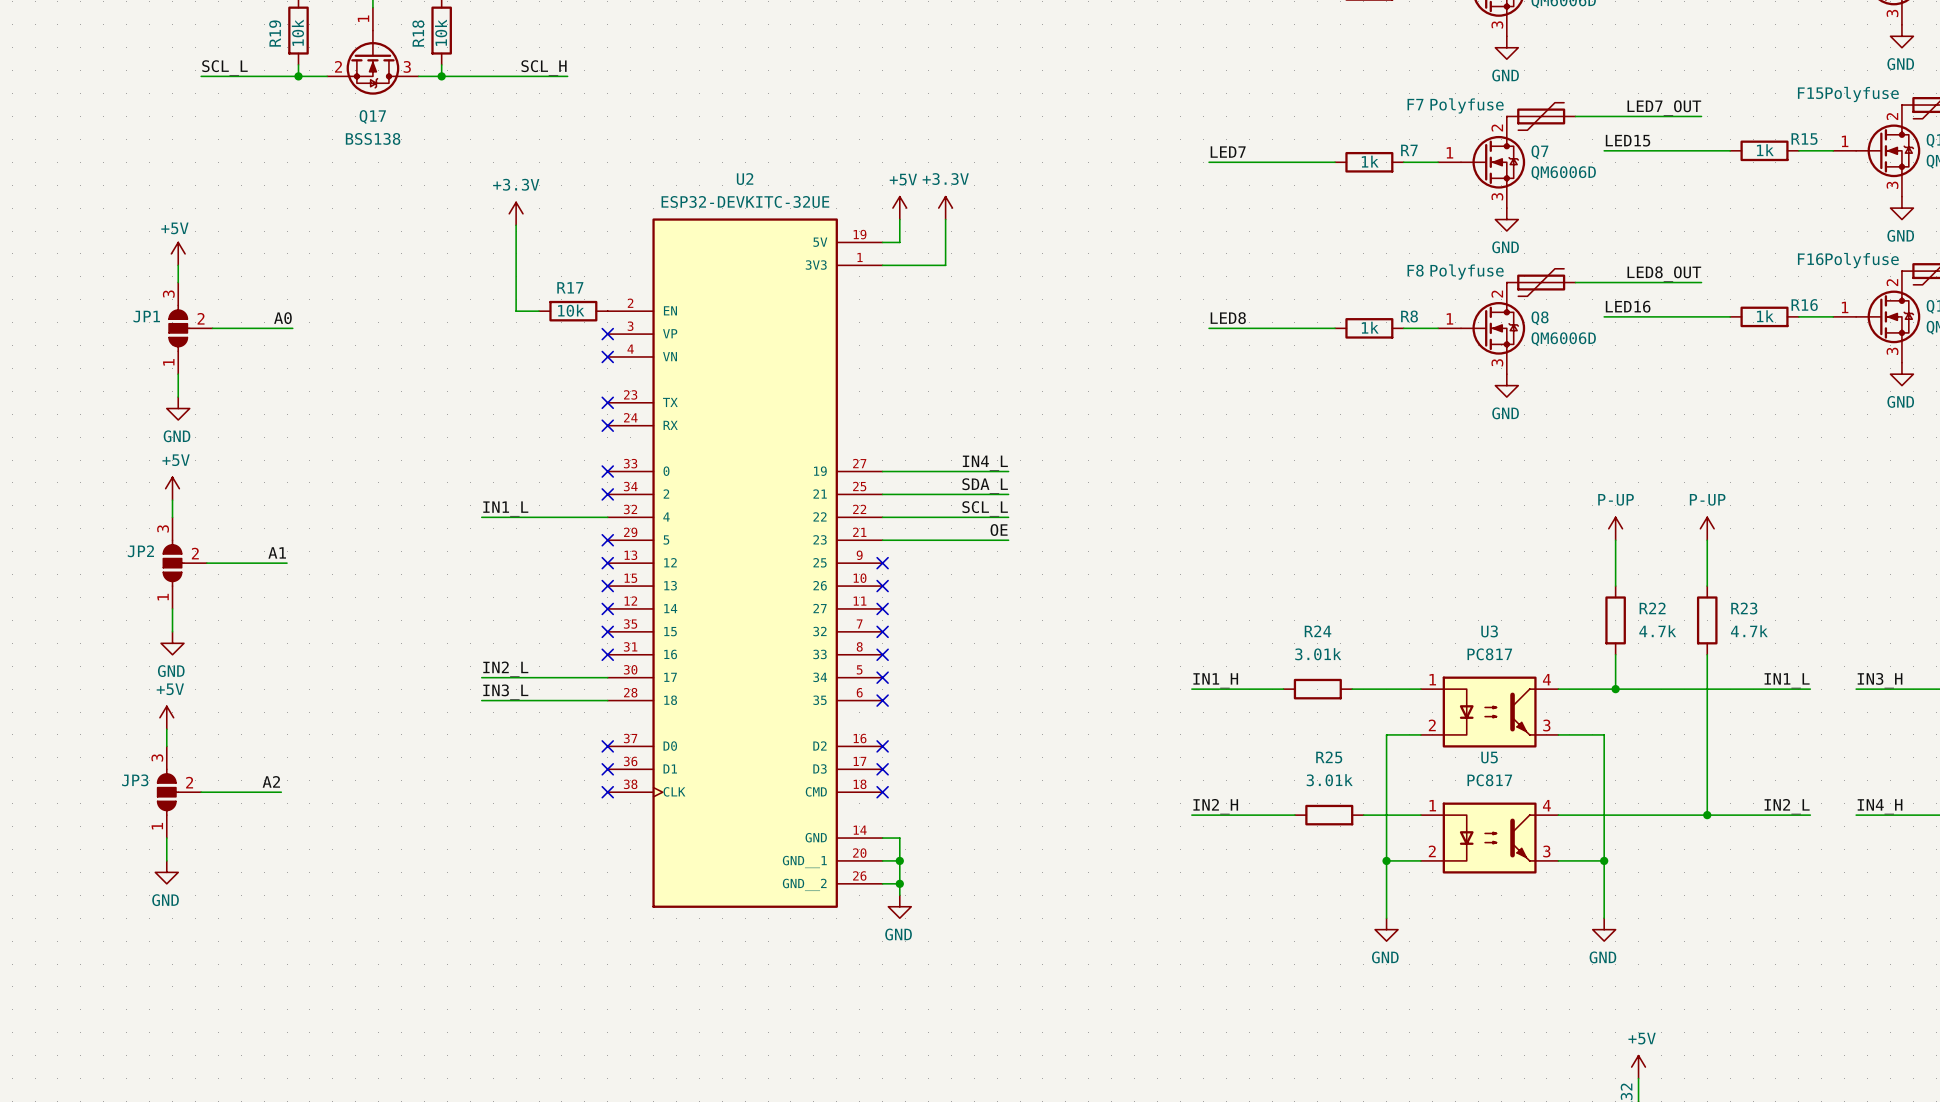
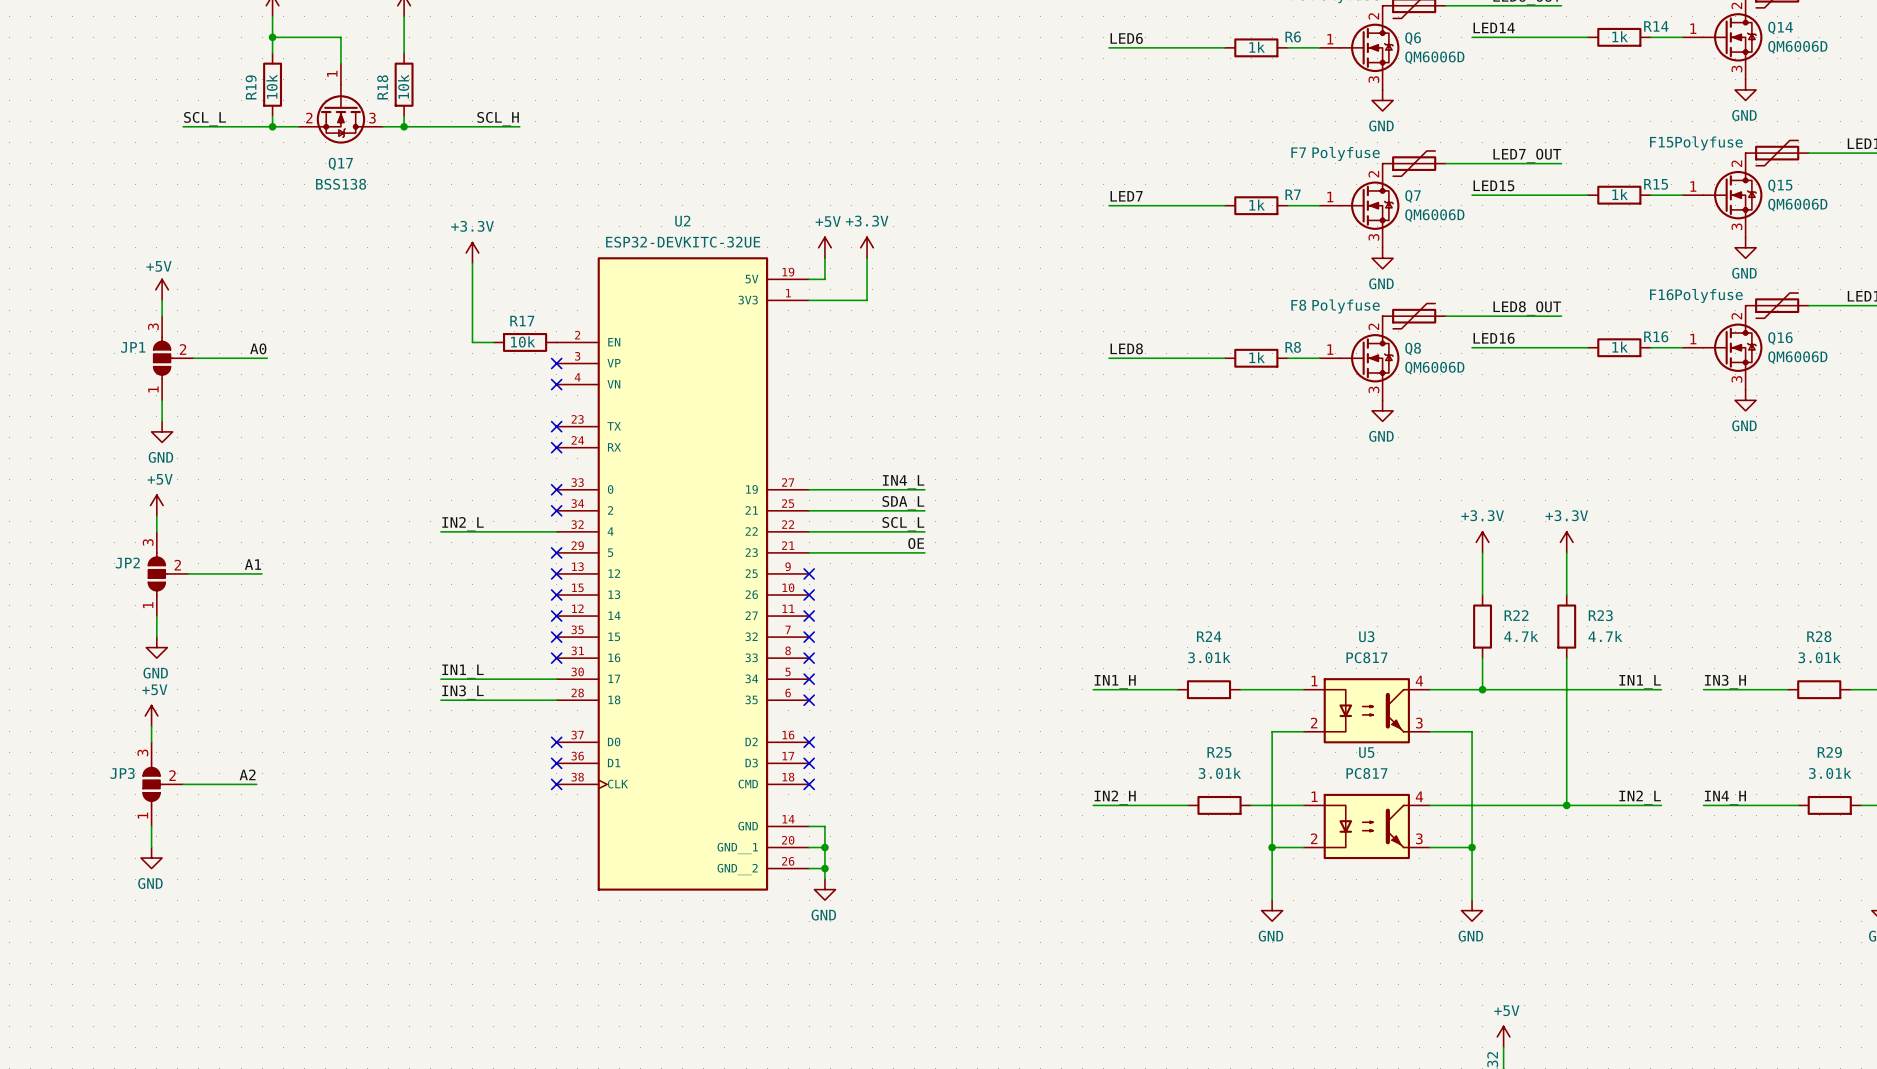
label: IN1_L (505, 508) -> IN2_L (463, 524)
power symbol: P-UP (1615, 528) -> +3.3V (1482, 542)
power symbol: P-UP (1707, 528) -> +3.3V (1566, 542)
label: IN2_L (505, 669) -> IN1_L (463, 671)

